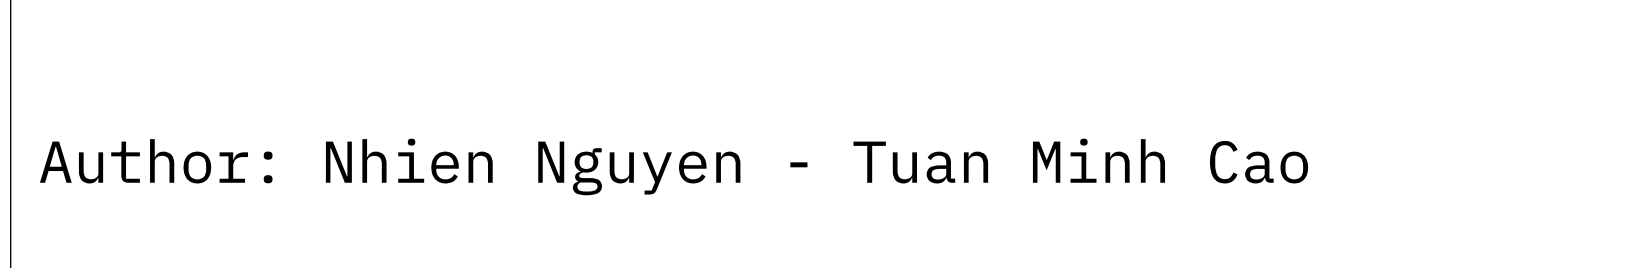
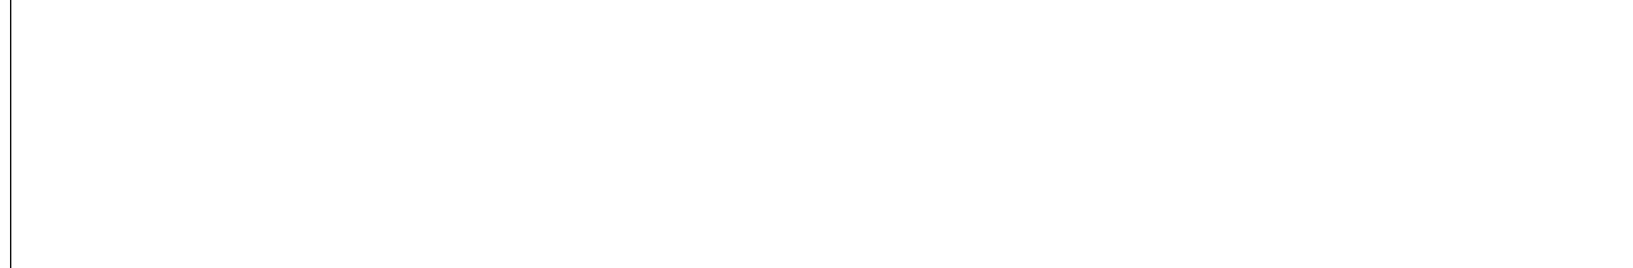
title block: Author: Nhien Nguyen - Tuan Minh Cao (674, 166) -> none

